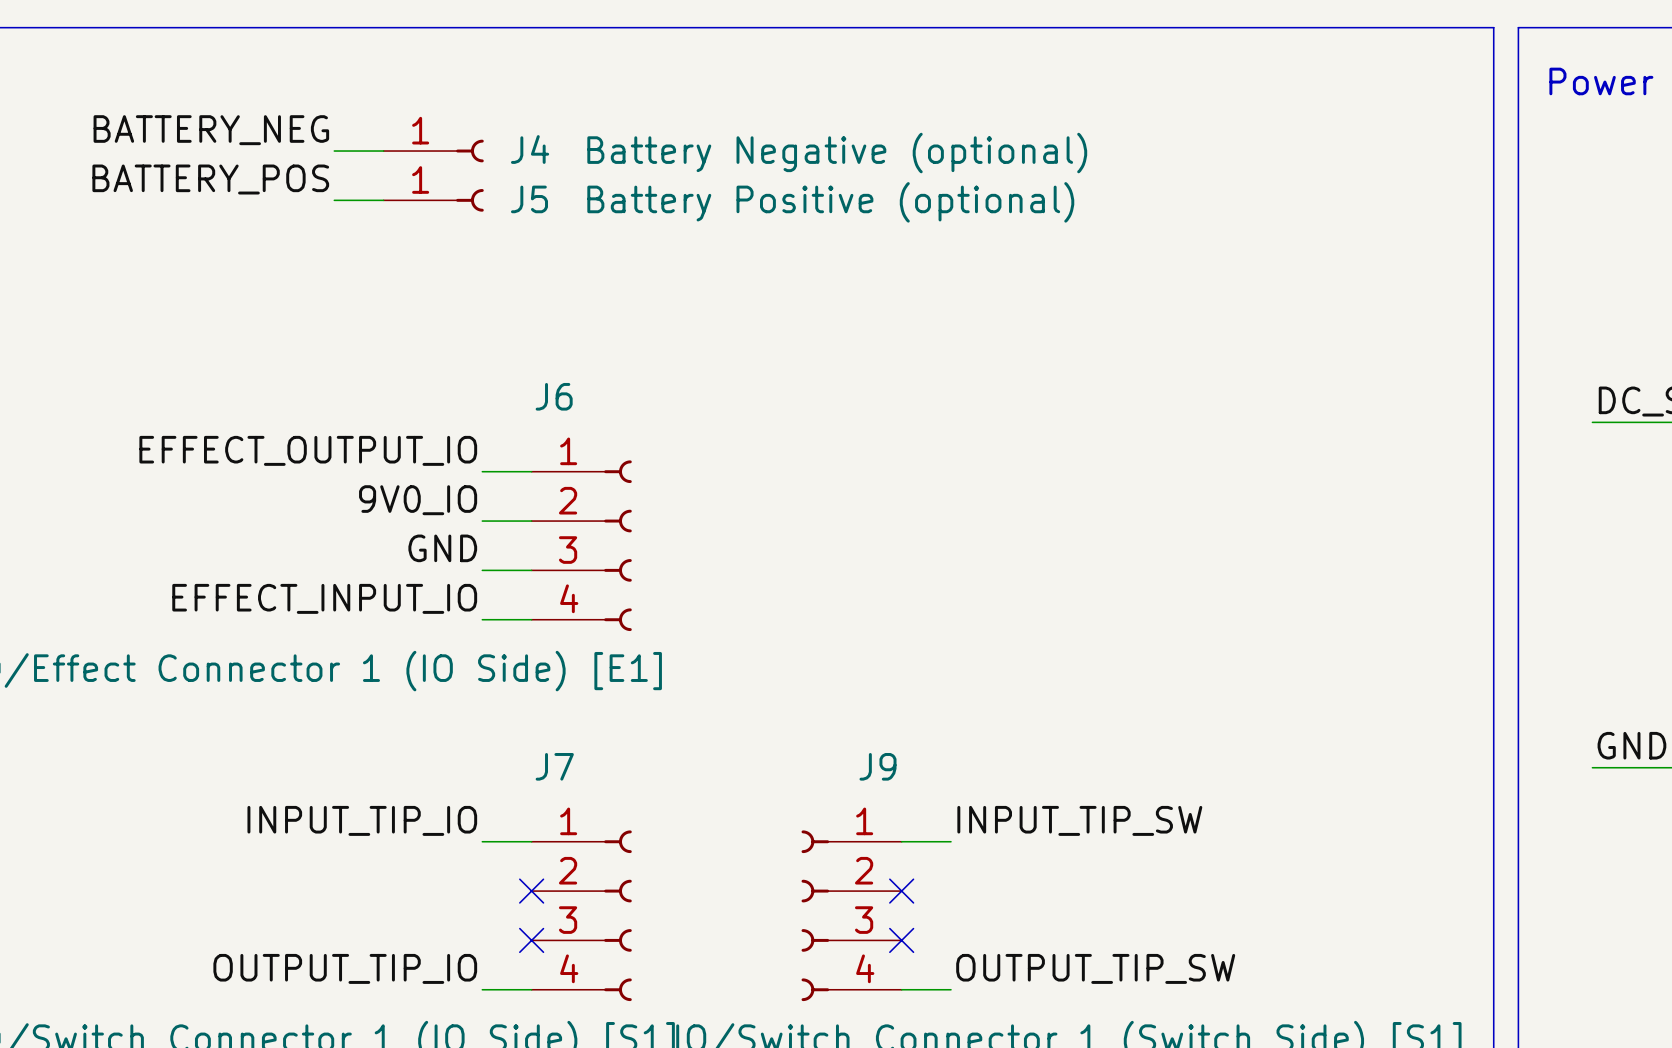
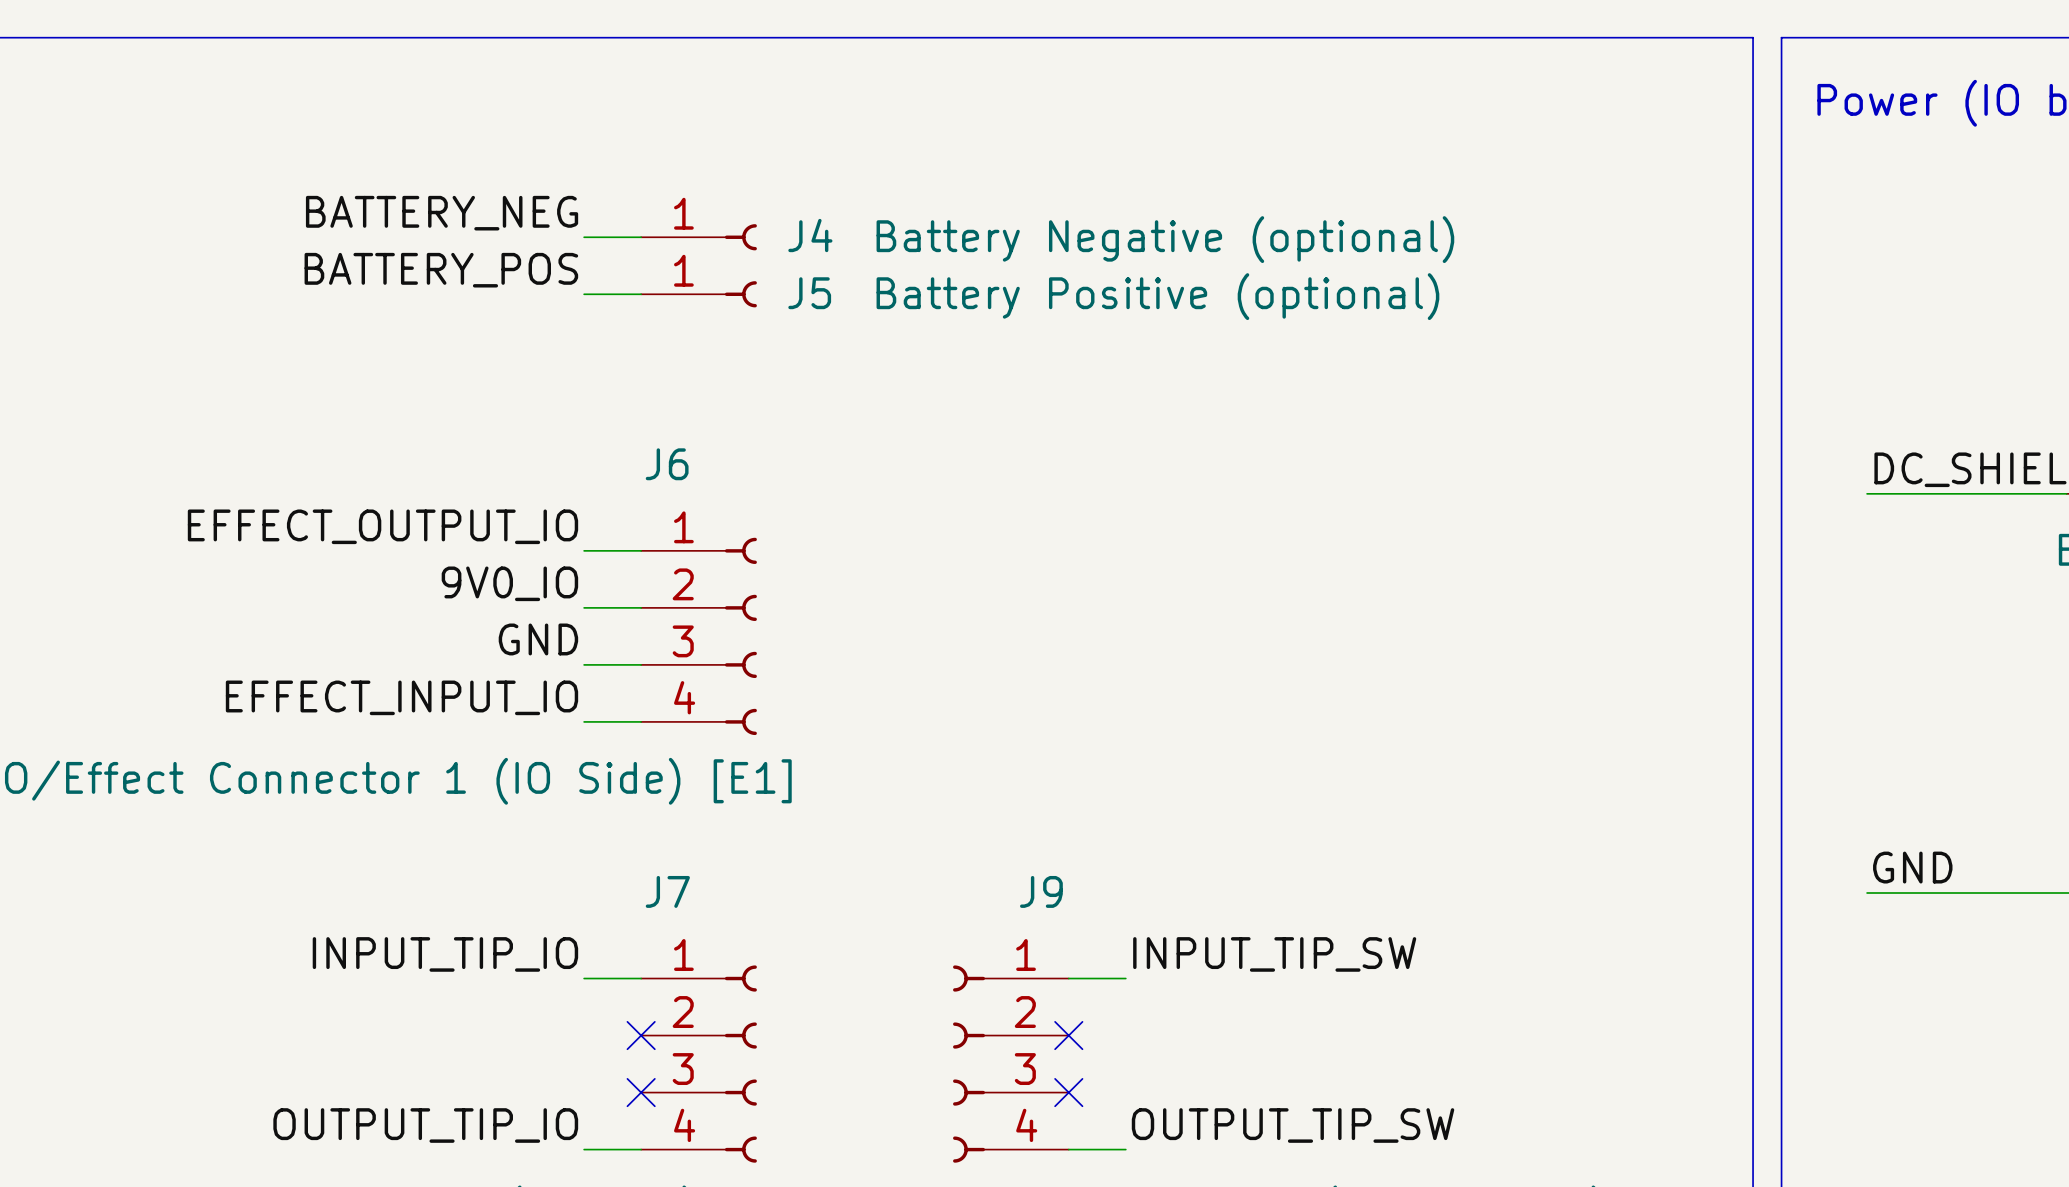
label position: BATTERY_NEG (211, 130) -> BATTERY_NEG (442, 213)
wire: (334, 151) (383, 151) -> (584, 237) (641, 237)
J4 position: (433, 151) -> (699, 237)
label position: BATTERY_POS (210, 179) -> BATTERY_POS (441, 270)
wire: (334, 200) (383, 200) -> (584, 294) (641, 294)
J5 position: (433, 200) -> (699, 294)

